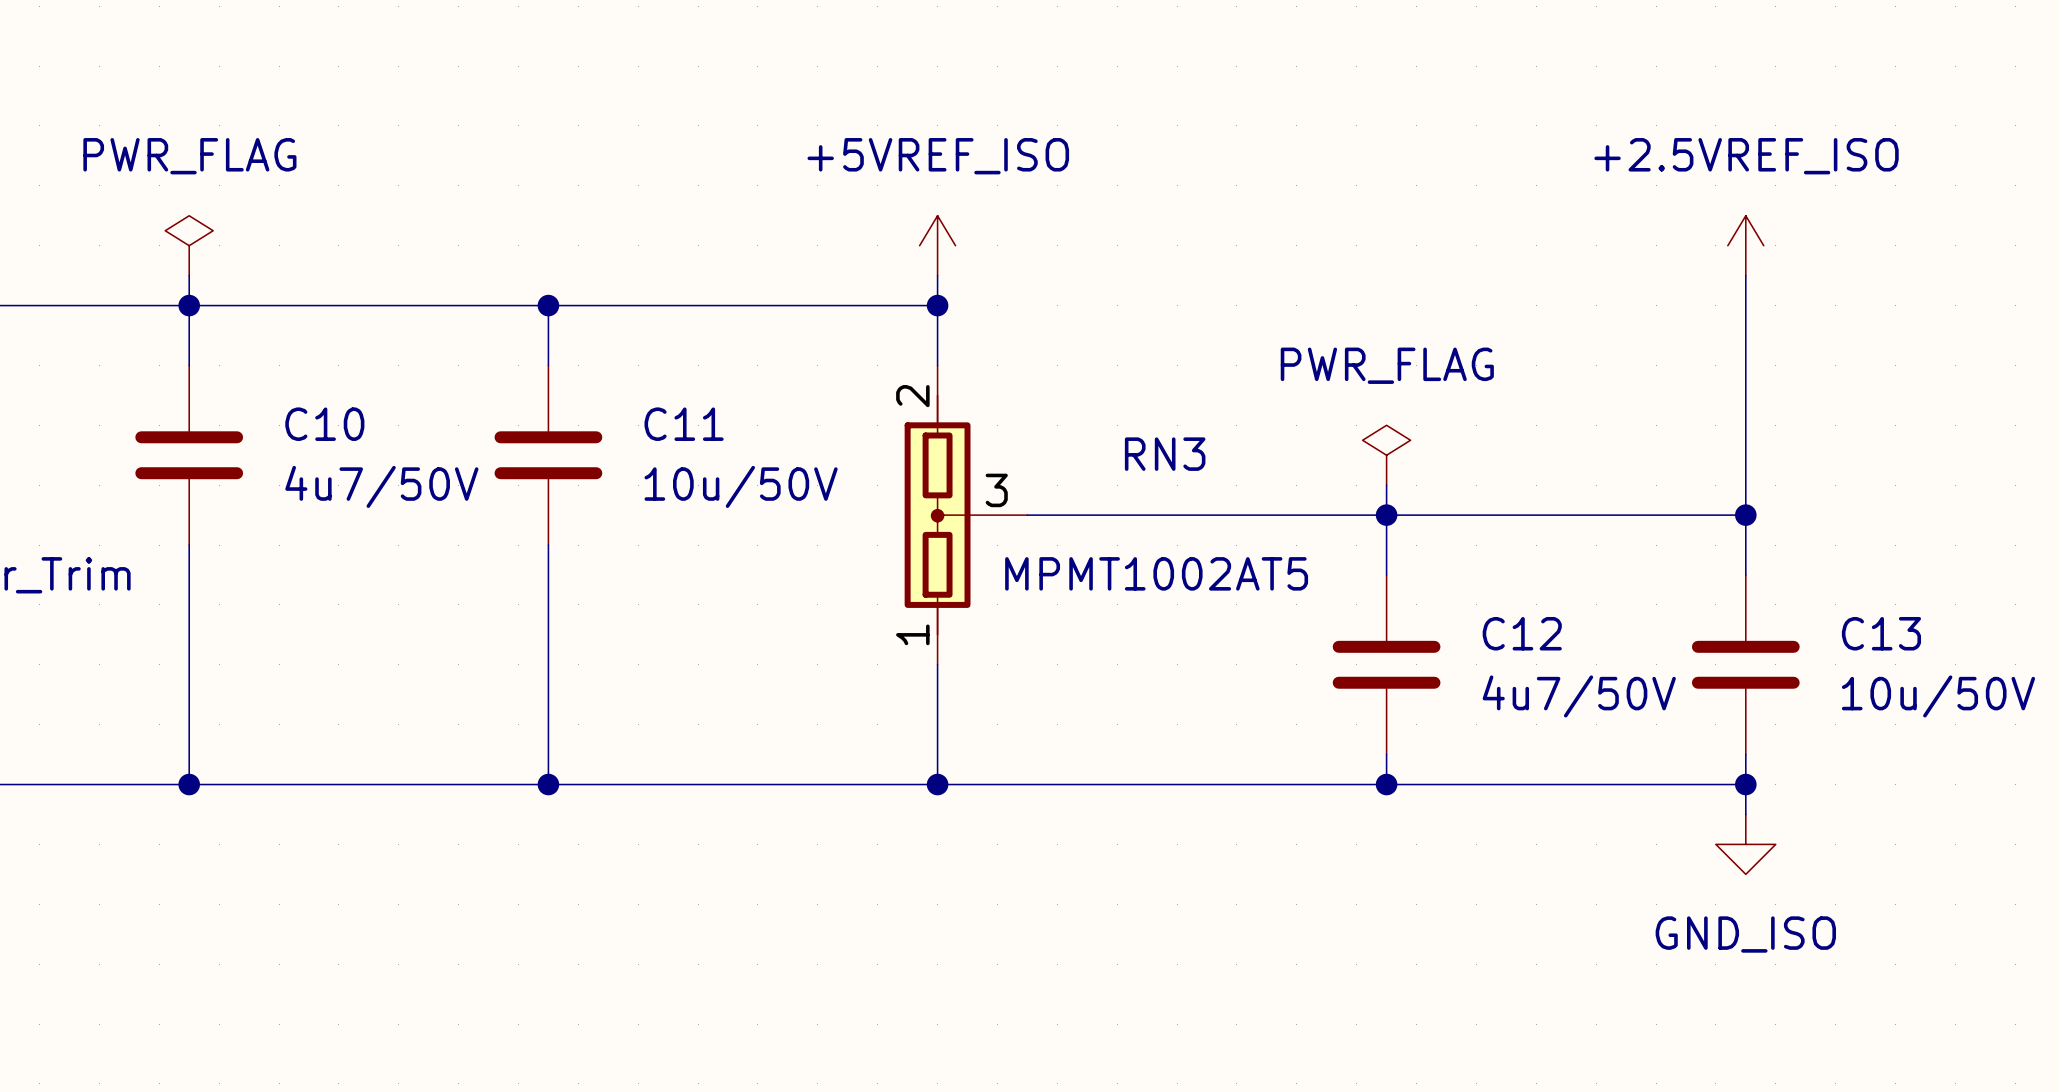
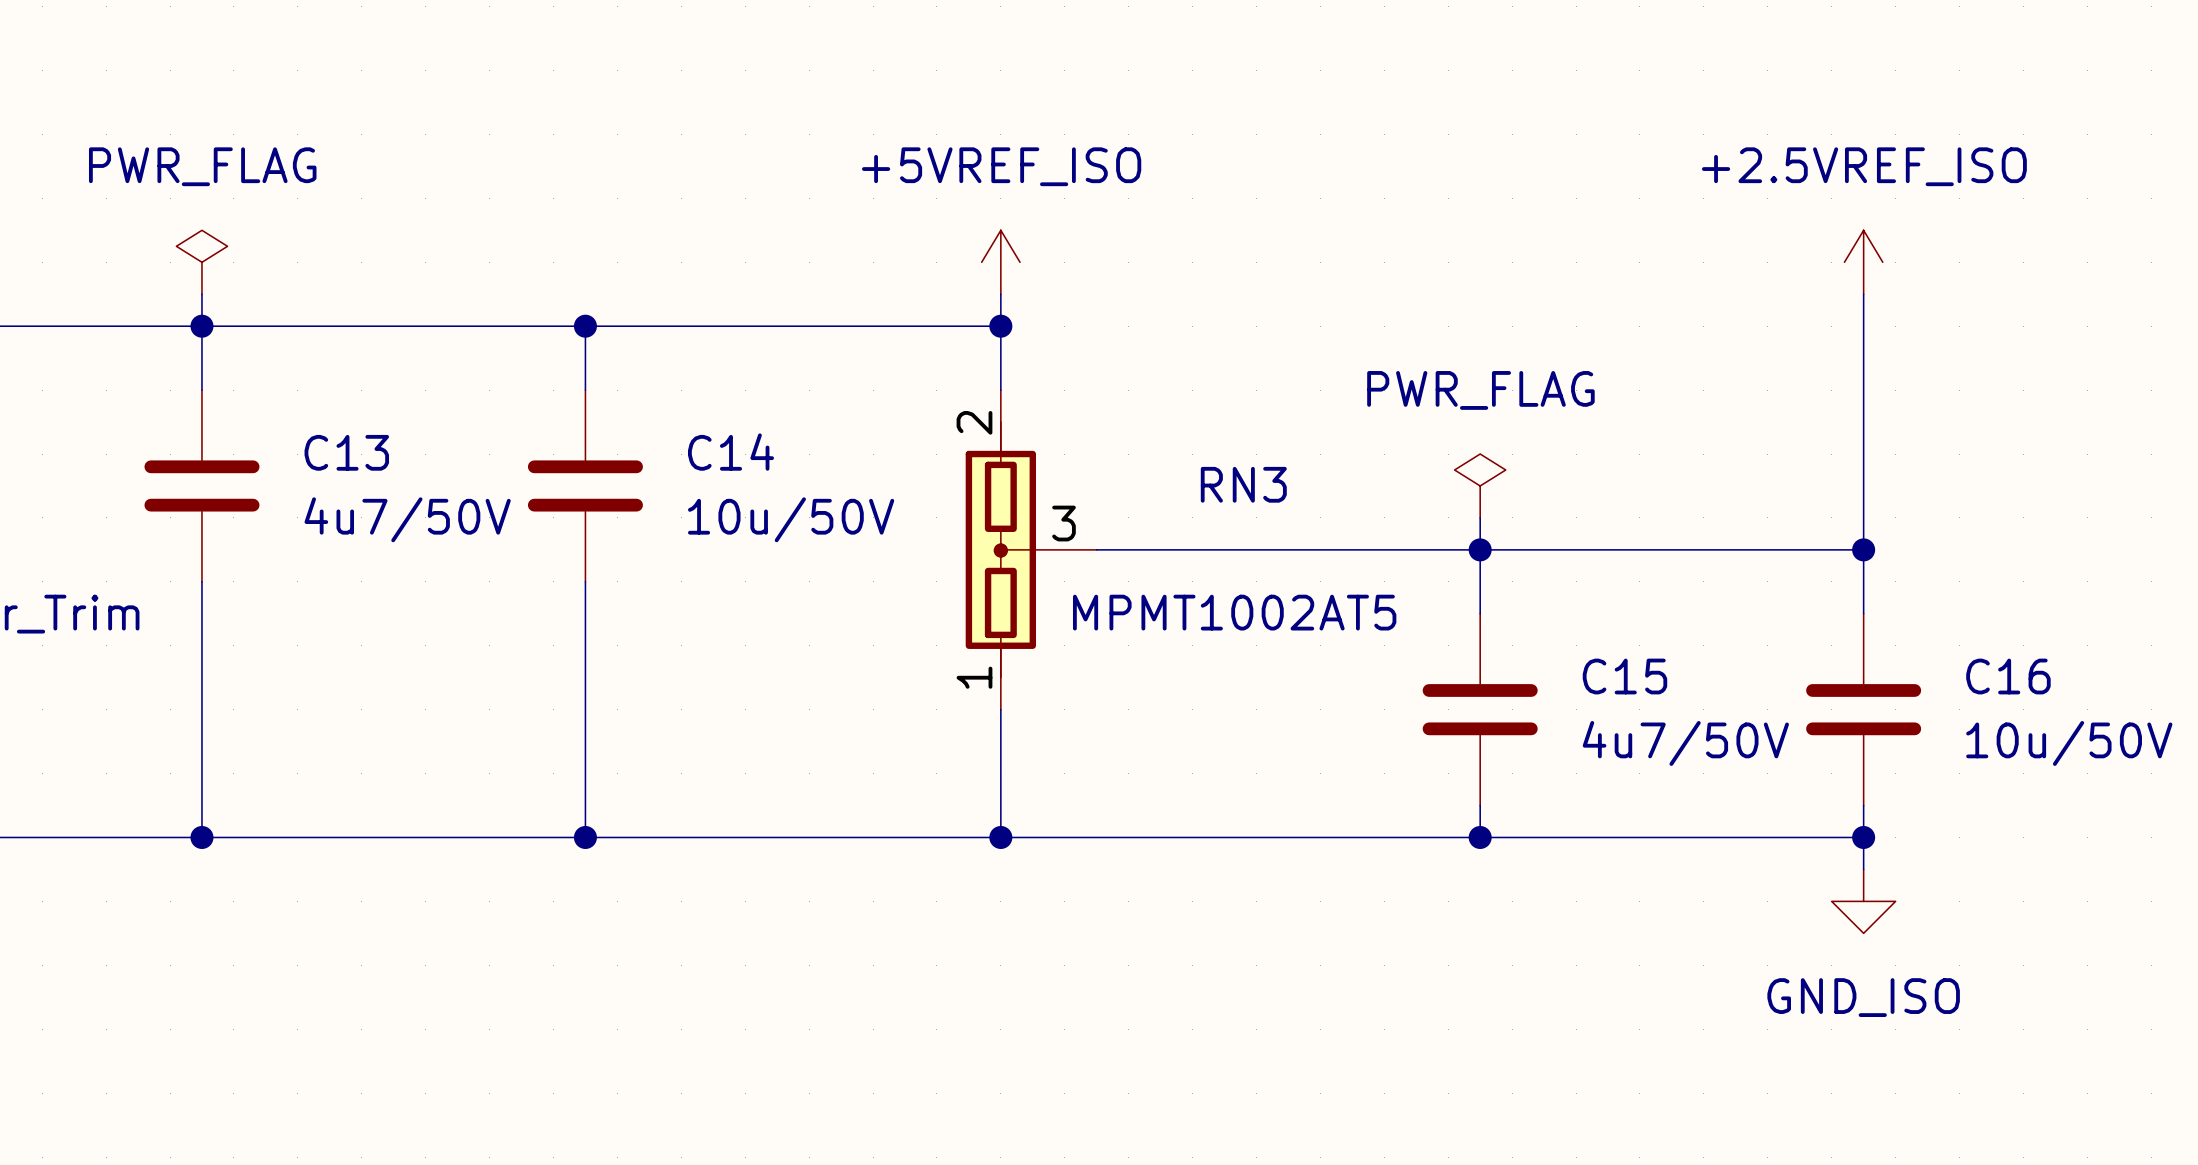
C10 name: C10 (324, 424) -> C13 (346, 452)
C11 name: C11 (684, 424) -> C14 (730, 452)
C12 name: C12 (1522, 633) -> C15 (1624, 676)
C13 name: C13 (1881, 633) -> C16 (2008, 676)

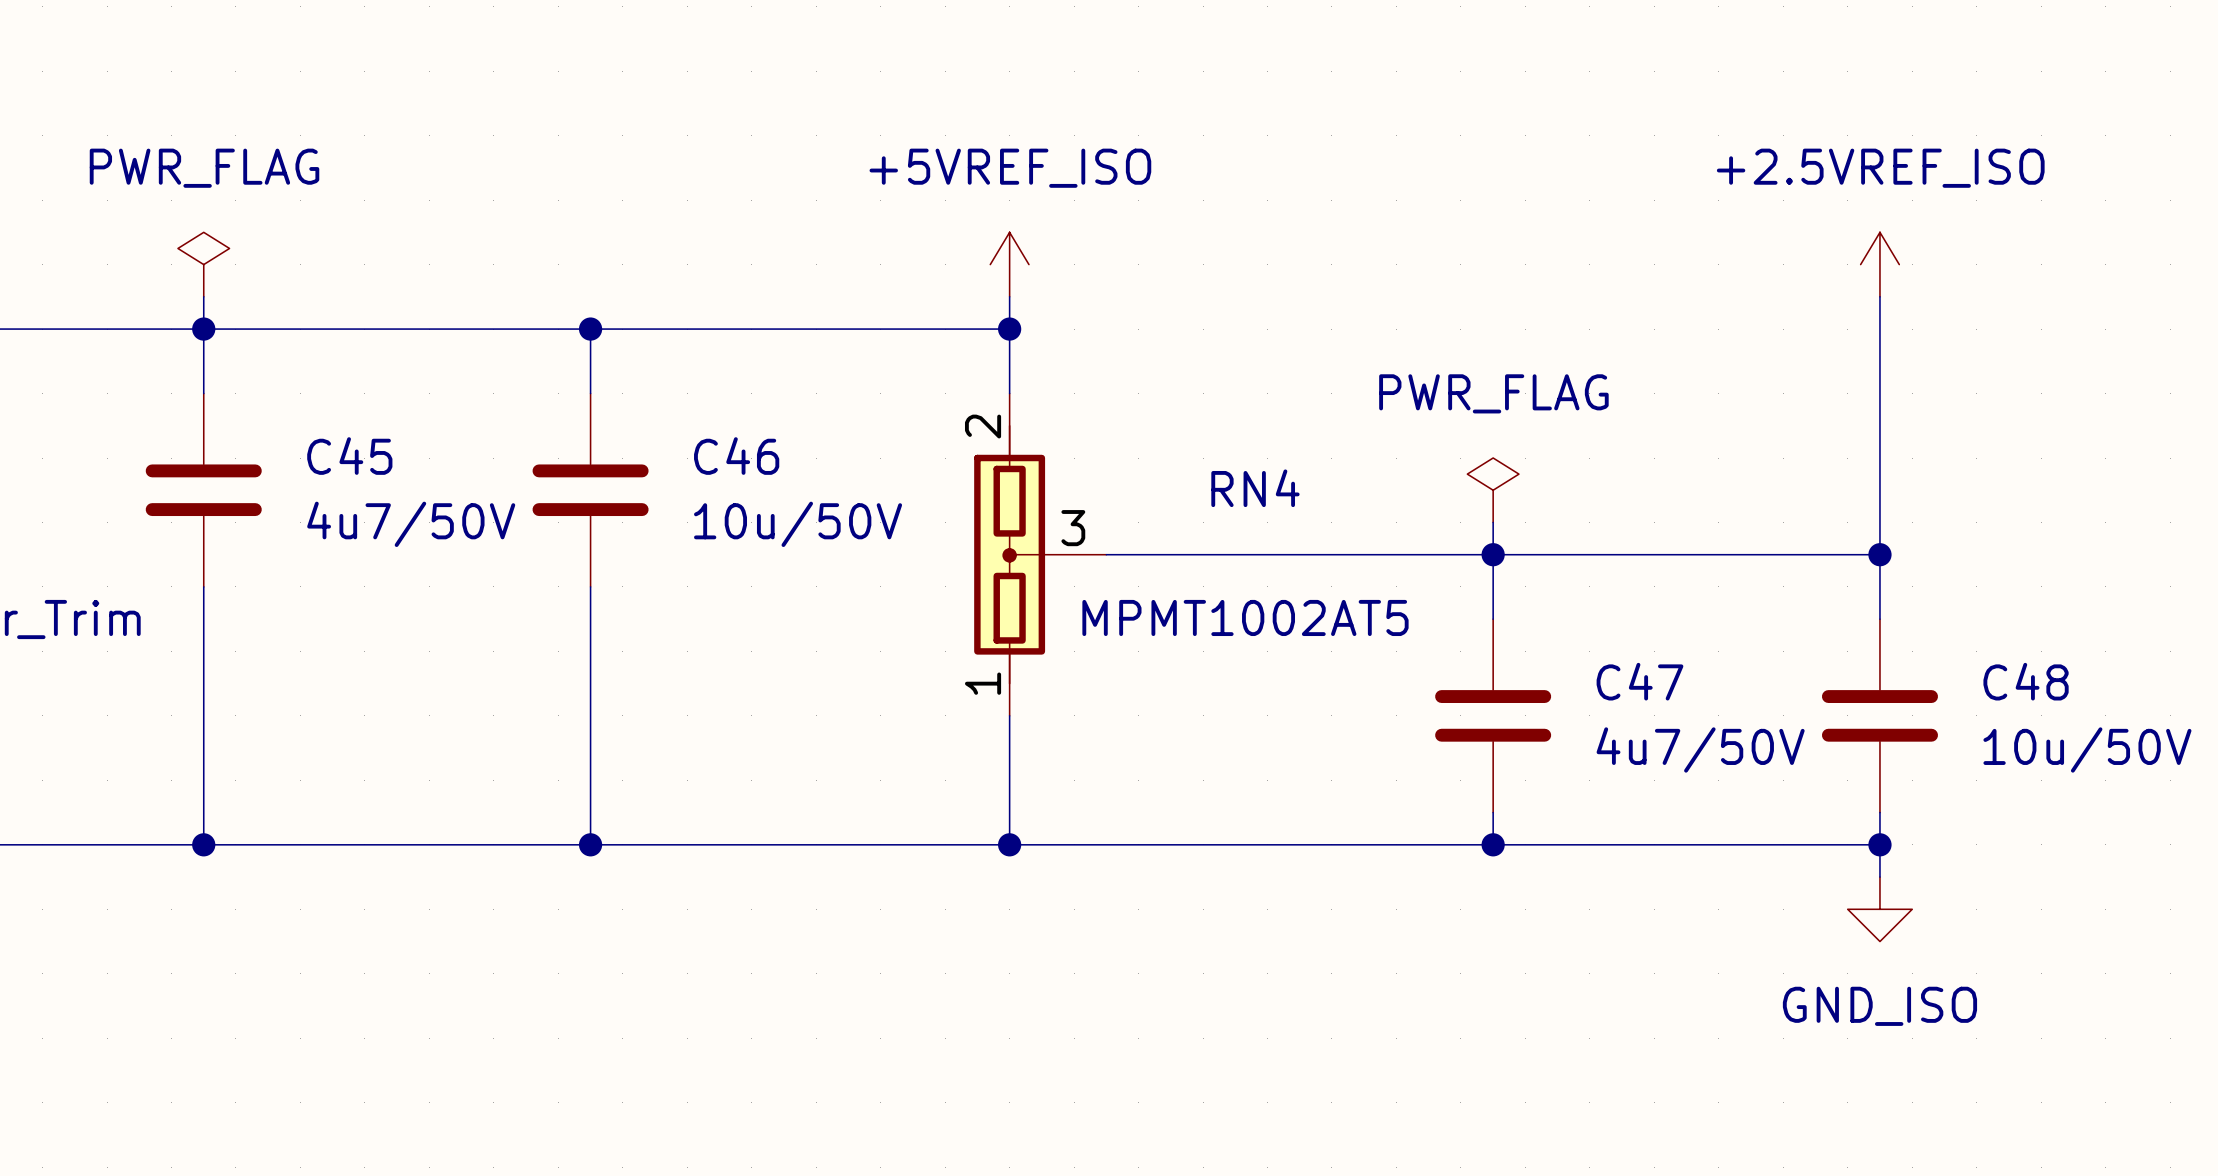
C13 name: C13 (346, 452) -> C45 (349, 456)
C14 name: C14 (730, 452) -> C46 (736, 456)
RN3 name: RN3 (1243, 484) -> RN4 (1255, 488)
C15 name: C15 (1624, 676) -> C47 (1639, 681)
C16 name: C16 (2008, 676) -> C48 (2026, 681)

